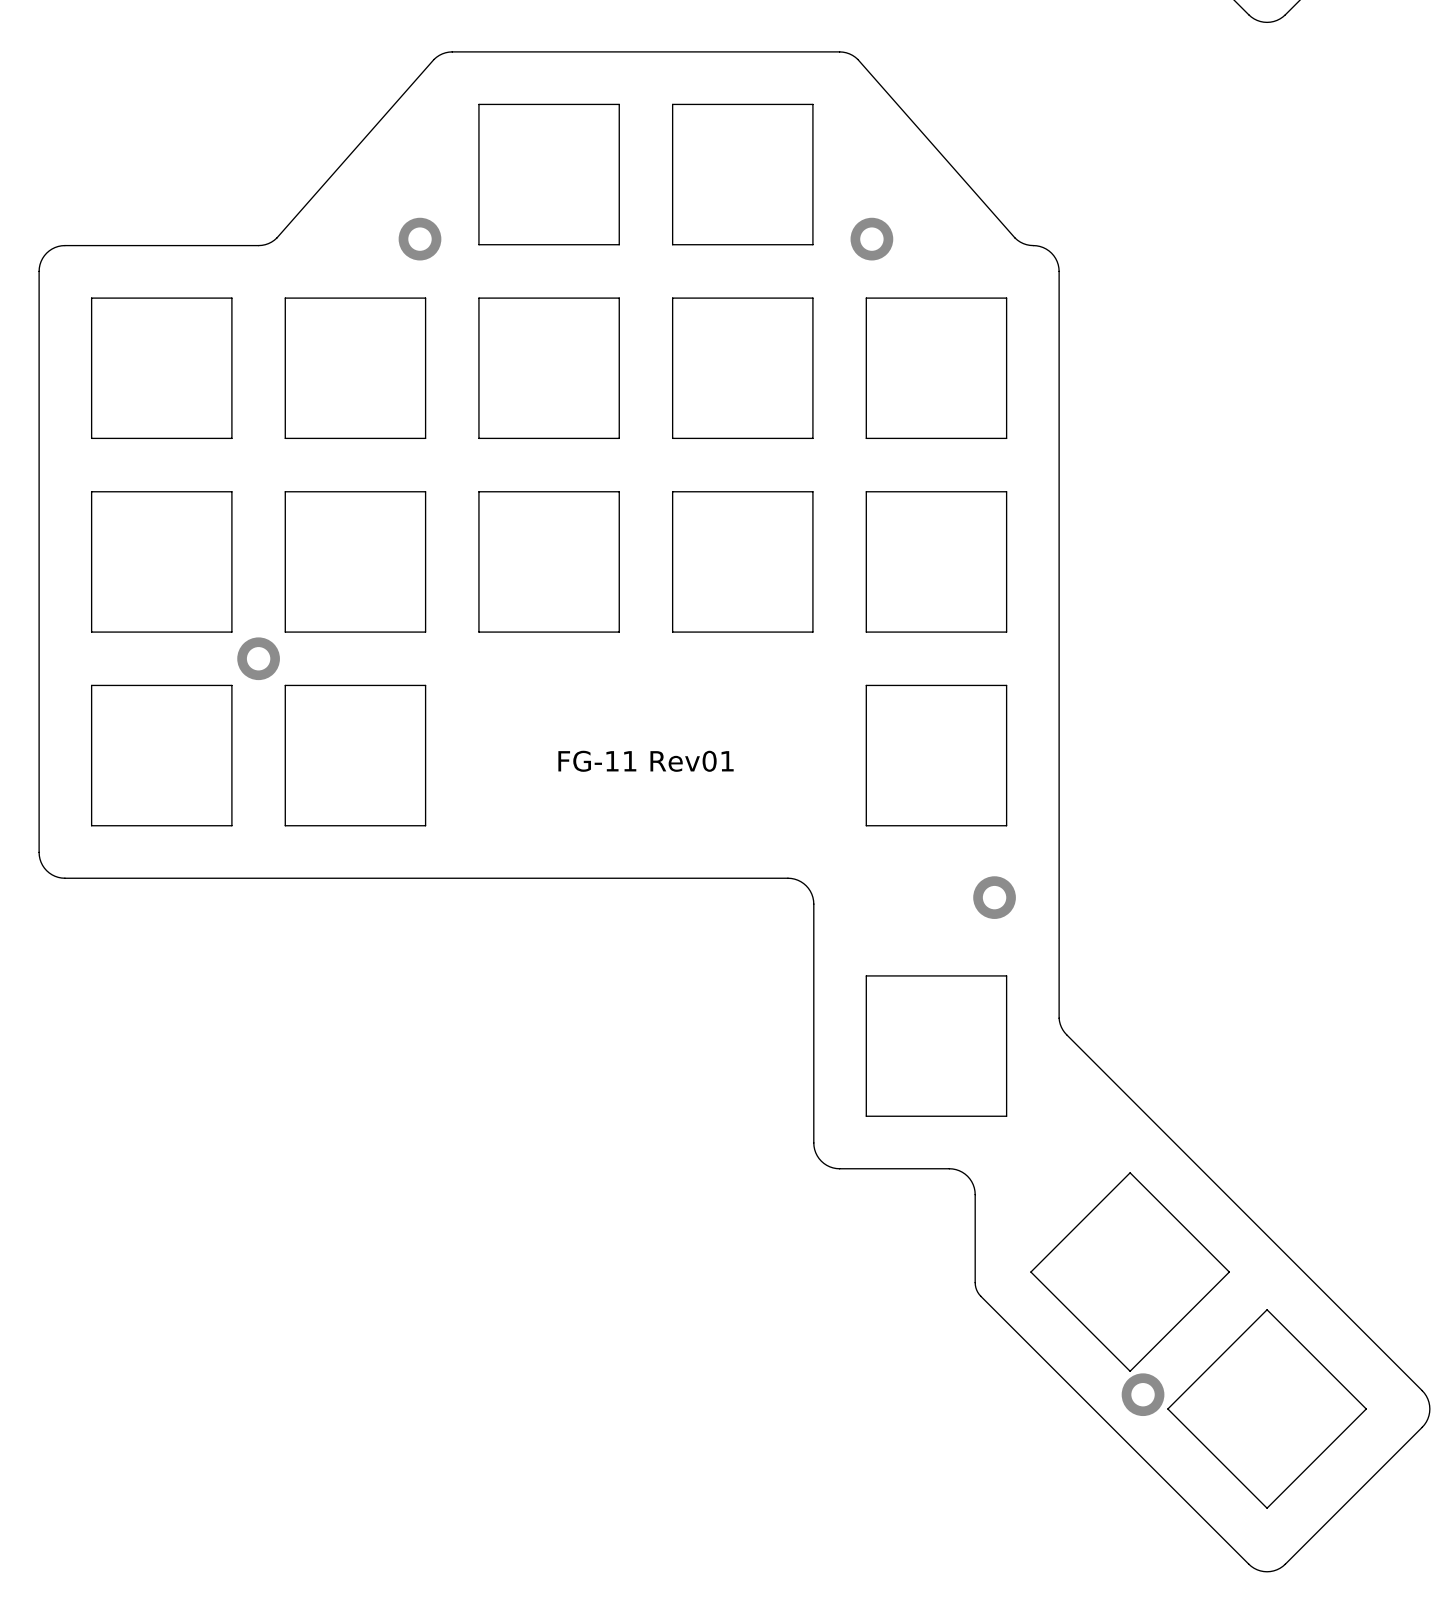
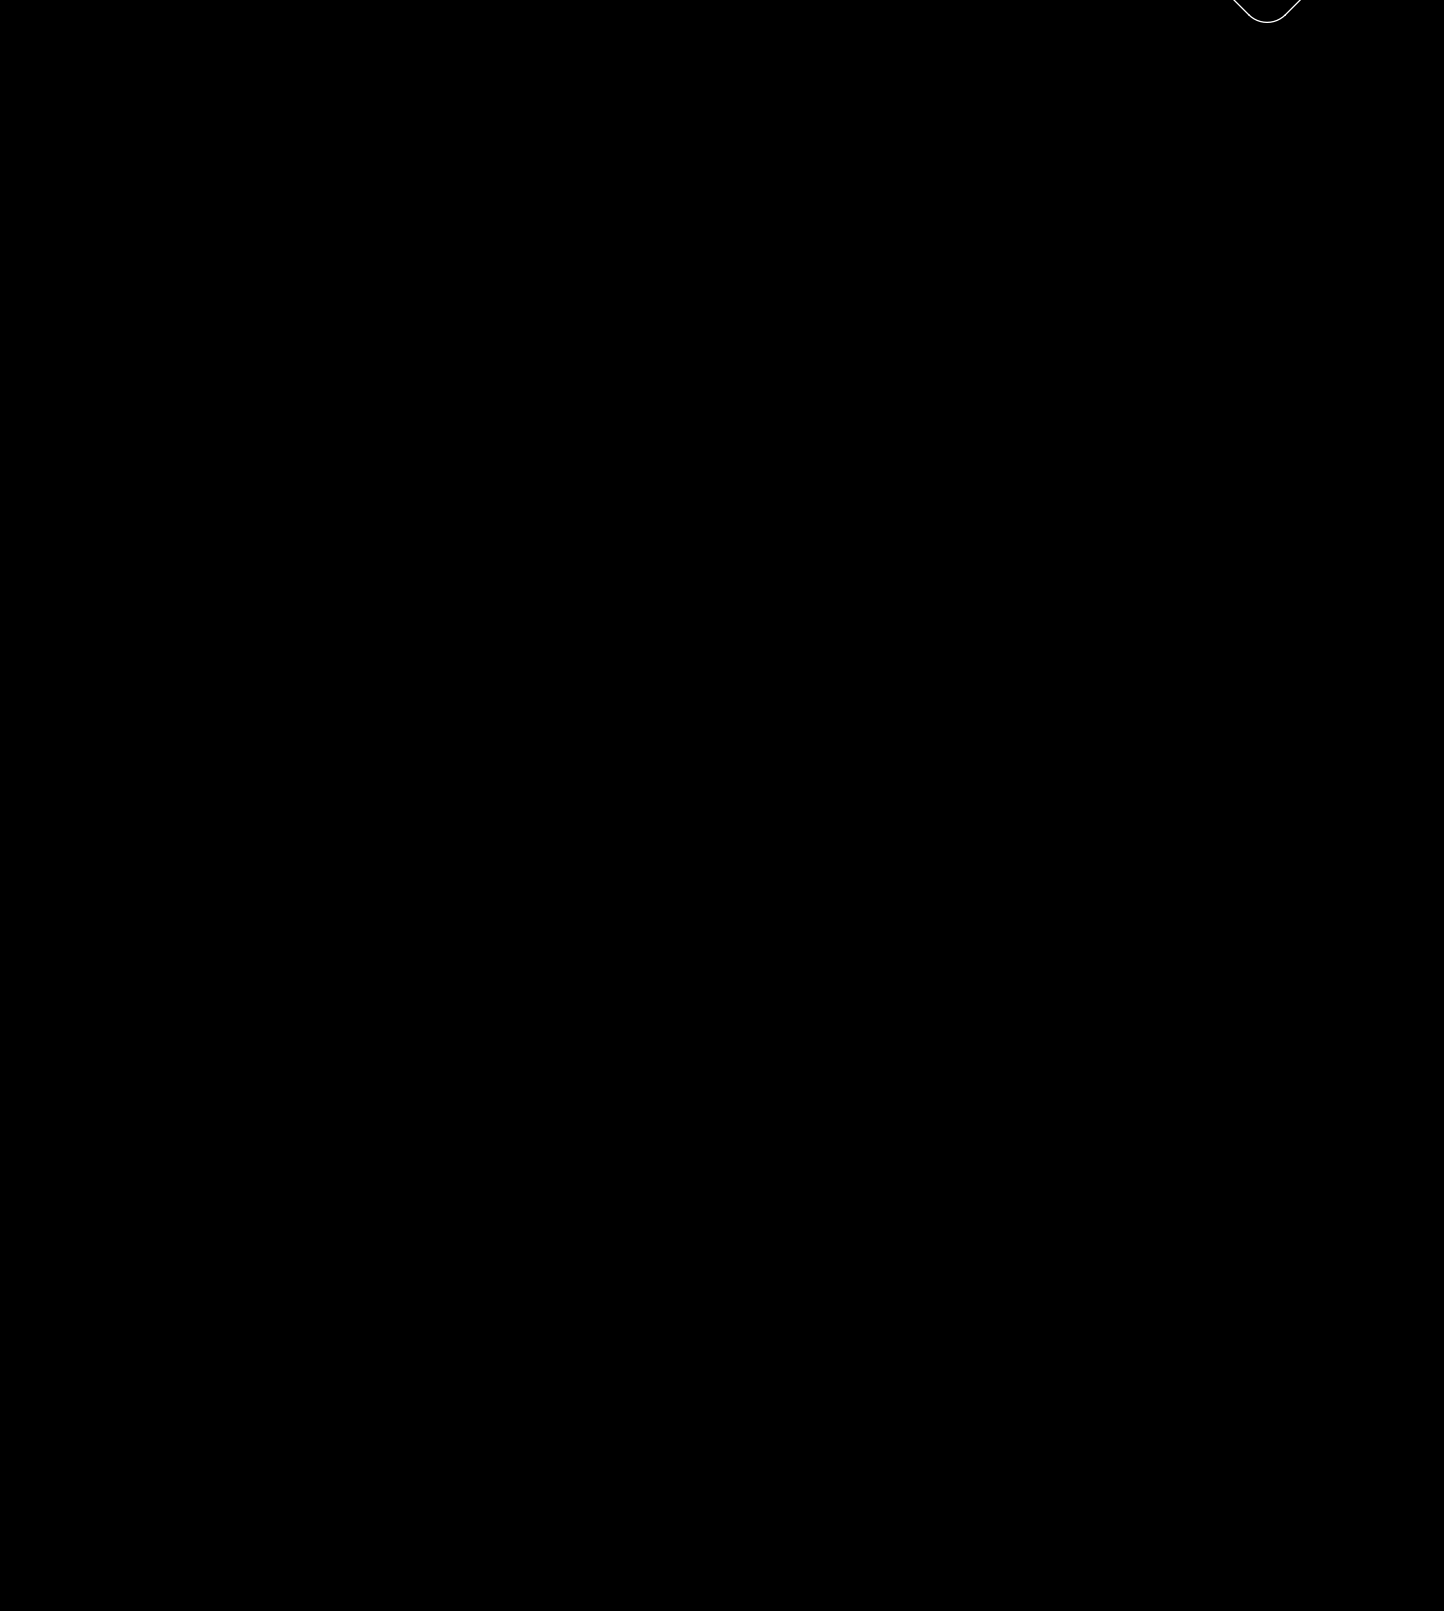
board edge: (452, 51) (839, 51) (849, 53) (857, 59) (1015, 238) (1023, 243) (1046, 249) (1055, 258) (1059, 271) (1060, 1024) (1066, 1034) (1422, 1390) (1429, 1405) (1428, 1415) (1422, 1427) (1279, 1568) (1263, 1571) (1248, 1564) (979, 1294) (975, 1282) (974, 1191) (967, 1176) (959, 1170) (949, 1168) (836, 1168) (826, 1165) (819, 1158) (813, 1142) (813, 900) (810, 891) (800, 881) (787, 878) (64, 878) (52, 874) (42, 865) (39, 852) (39, 271) (42, 258) (52, 249) (61, 245) (258, 245) (271, 242) (434, 59) (442, 53) (452, 51) -> none
drawing: [478, 103, 620, 246] -> none
drawing: [672, 103, 814, 246] -> none
part: (420, 239) -> none
part: (871, 239) -> none
drawing: [91, 297, 233, 440] -> none
drawing: [284, 297, 427, 440] -> none
drawing: [478, 297, 620, 440] -> none
drawing: [672, 297, 814, 440] -> none
drawing: [865, 297, 1008, 440] -> none
drawing: [91, 491, 233, 633] -> none
drawing: [284, 491, 427, 633] -> none
drawing: [478, 491, 620, 633] -> none
drawing: [672, 491, 814, 633] -> none
drawing: [865, 491, 1008, 633] -> none
part: (258, 658) -> none
drawing: [91, 684, 233, 827] -> none
drawing: [284, 684, 427, 827] -> none
drawing: [865, 684, 1008, 827] -> none
text: FG-11 Rev01 (646, 761) -> none
part: (994, 897) -> none
drawing: [865, 975, 1008, 1117] -> none
drawing: [1030, 1172, 1367, 1509] -> none
part: (1143, 1394) -> none

